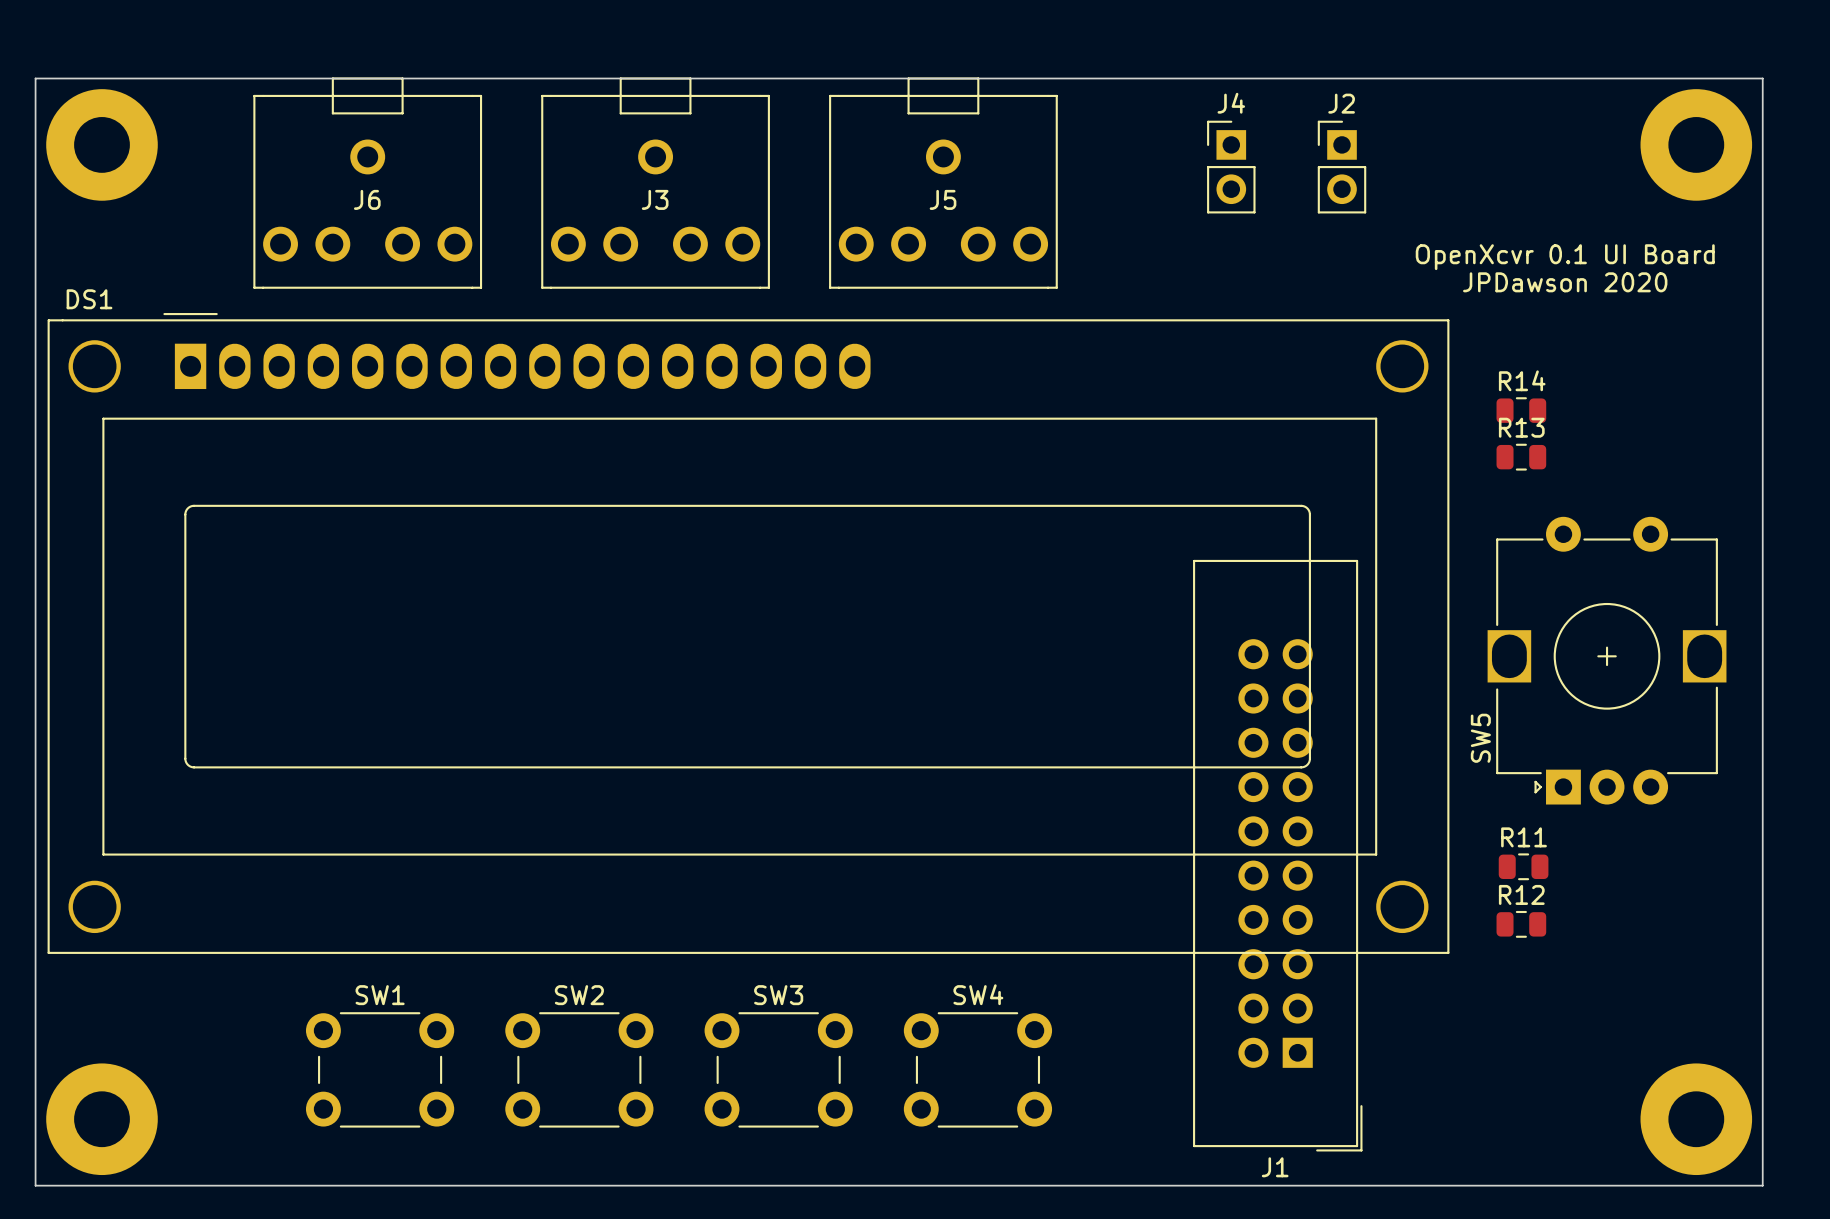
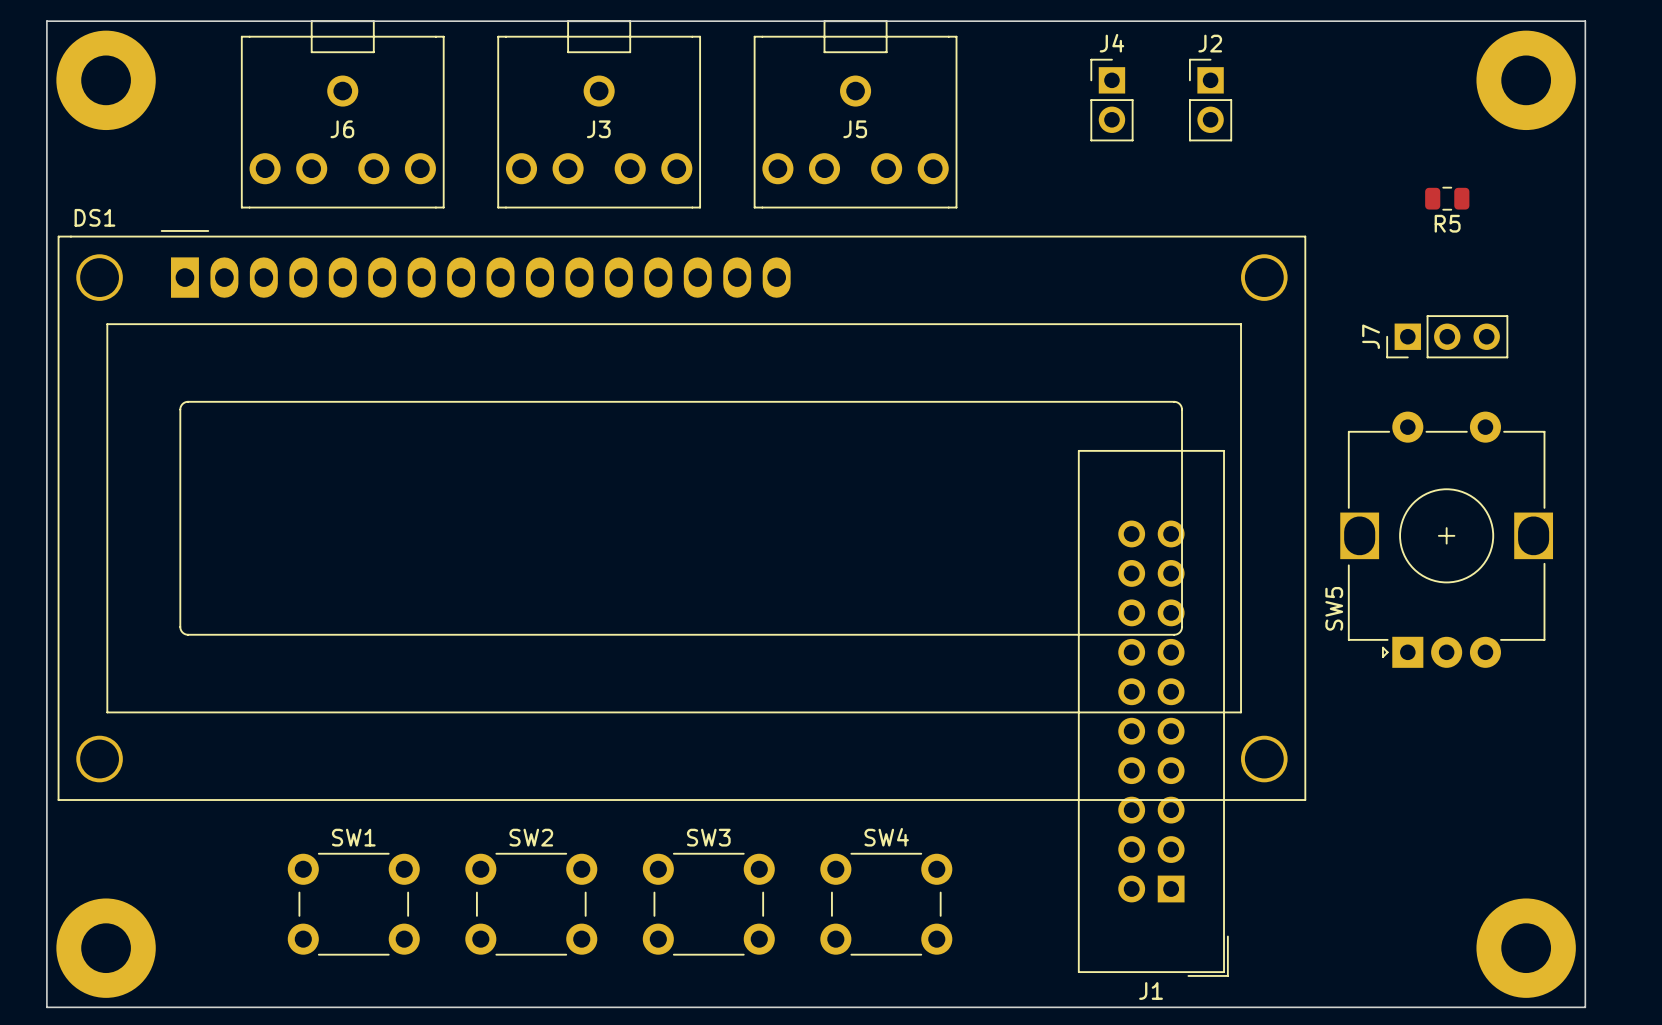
text: OpenXcvr 0.1 UI Board (1565, 257) -> none
R5: none -> (1447, 198)
text: JPDawson 2020 (1565, 282) -> none
R14: (1521, 410) -> none
J7: none -> (1447, 336)
R13: (1521, 457) -> none
R11: (1523, 866) -> none
R12: (1521, 924) -> none

